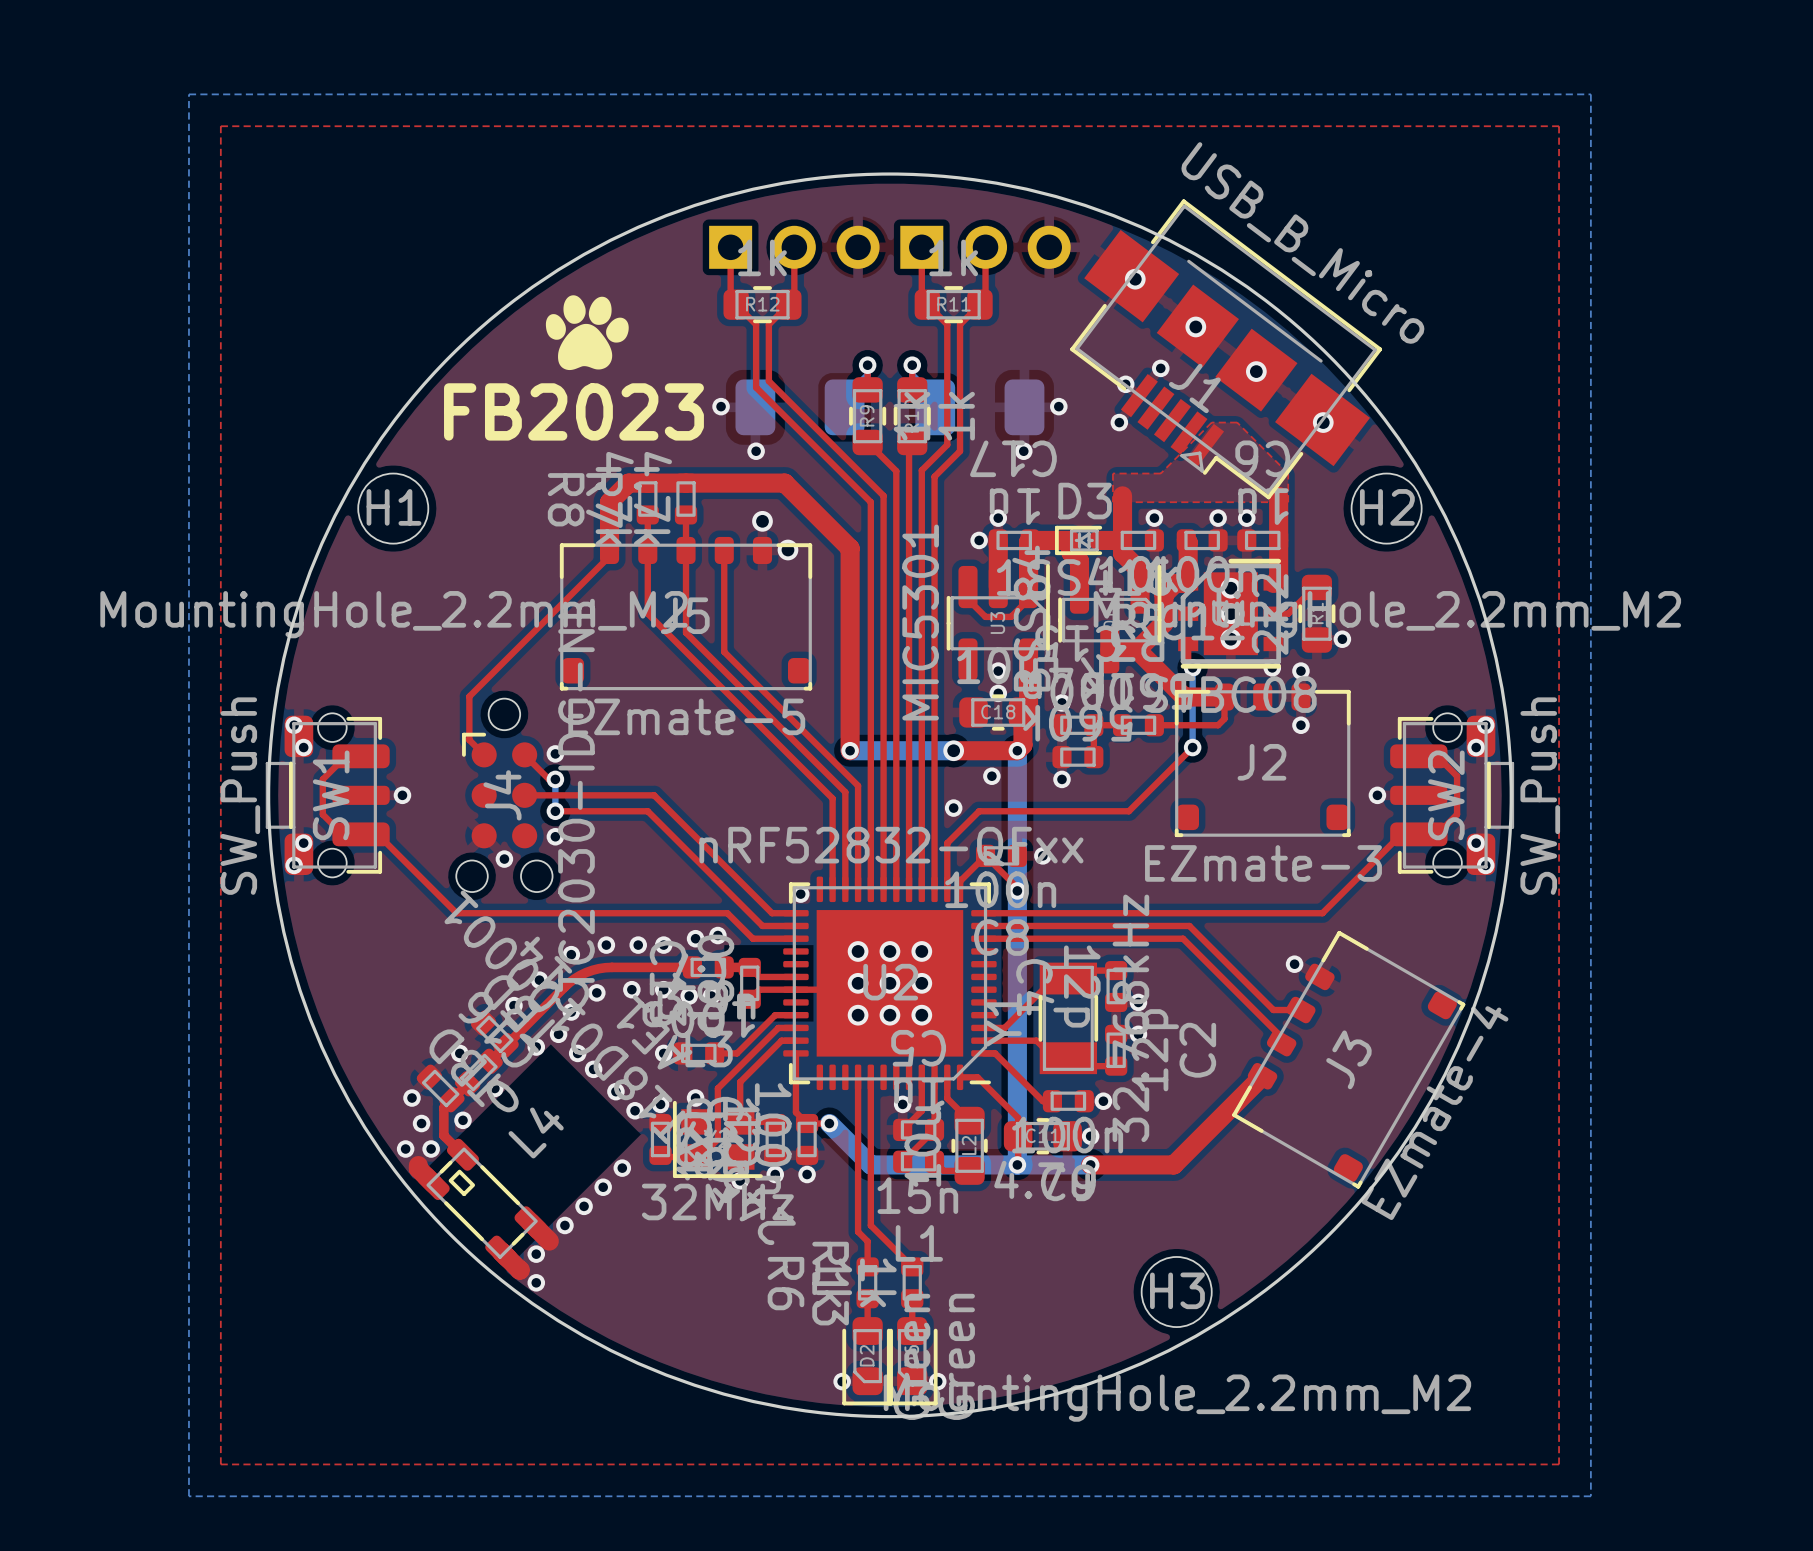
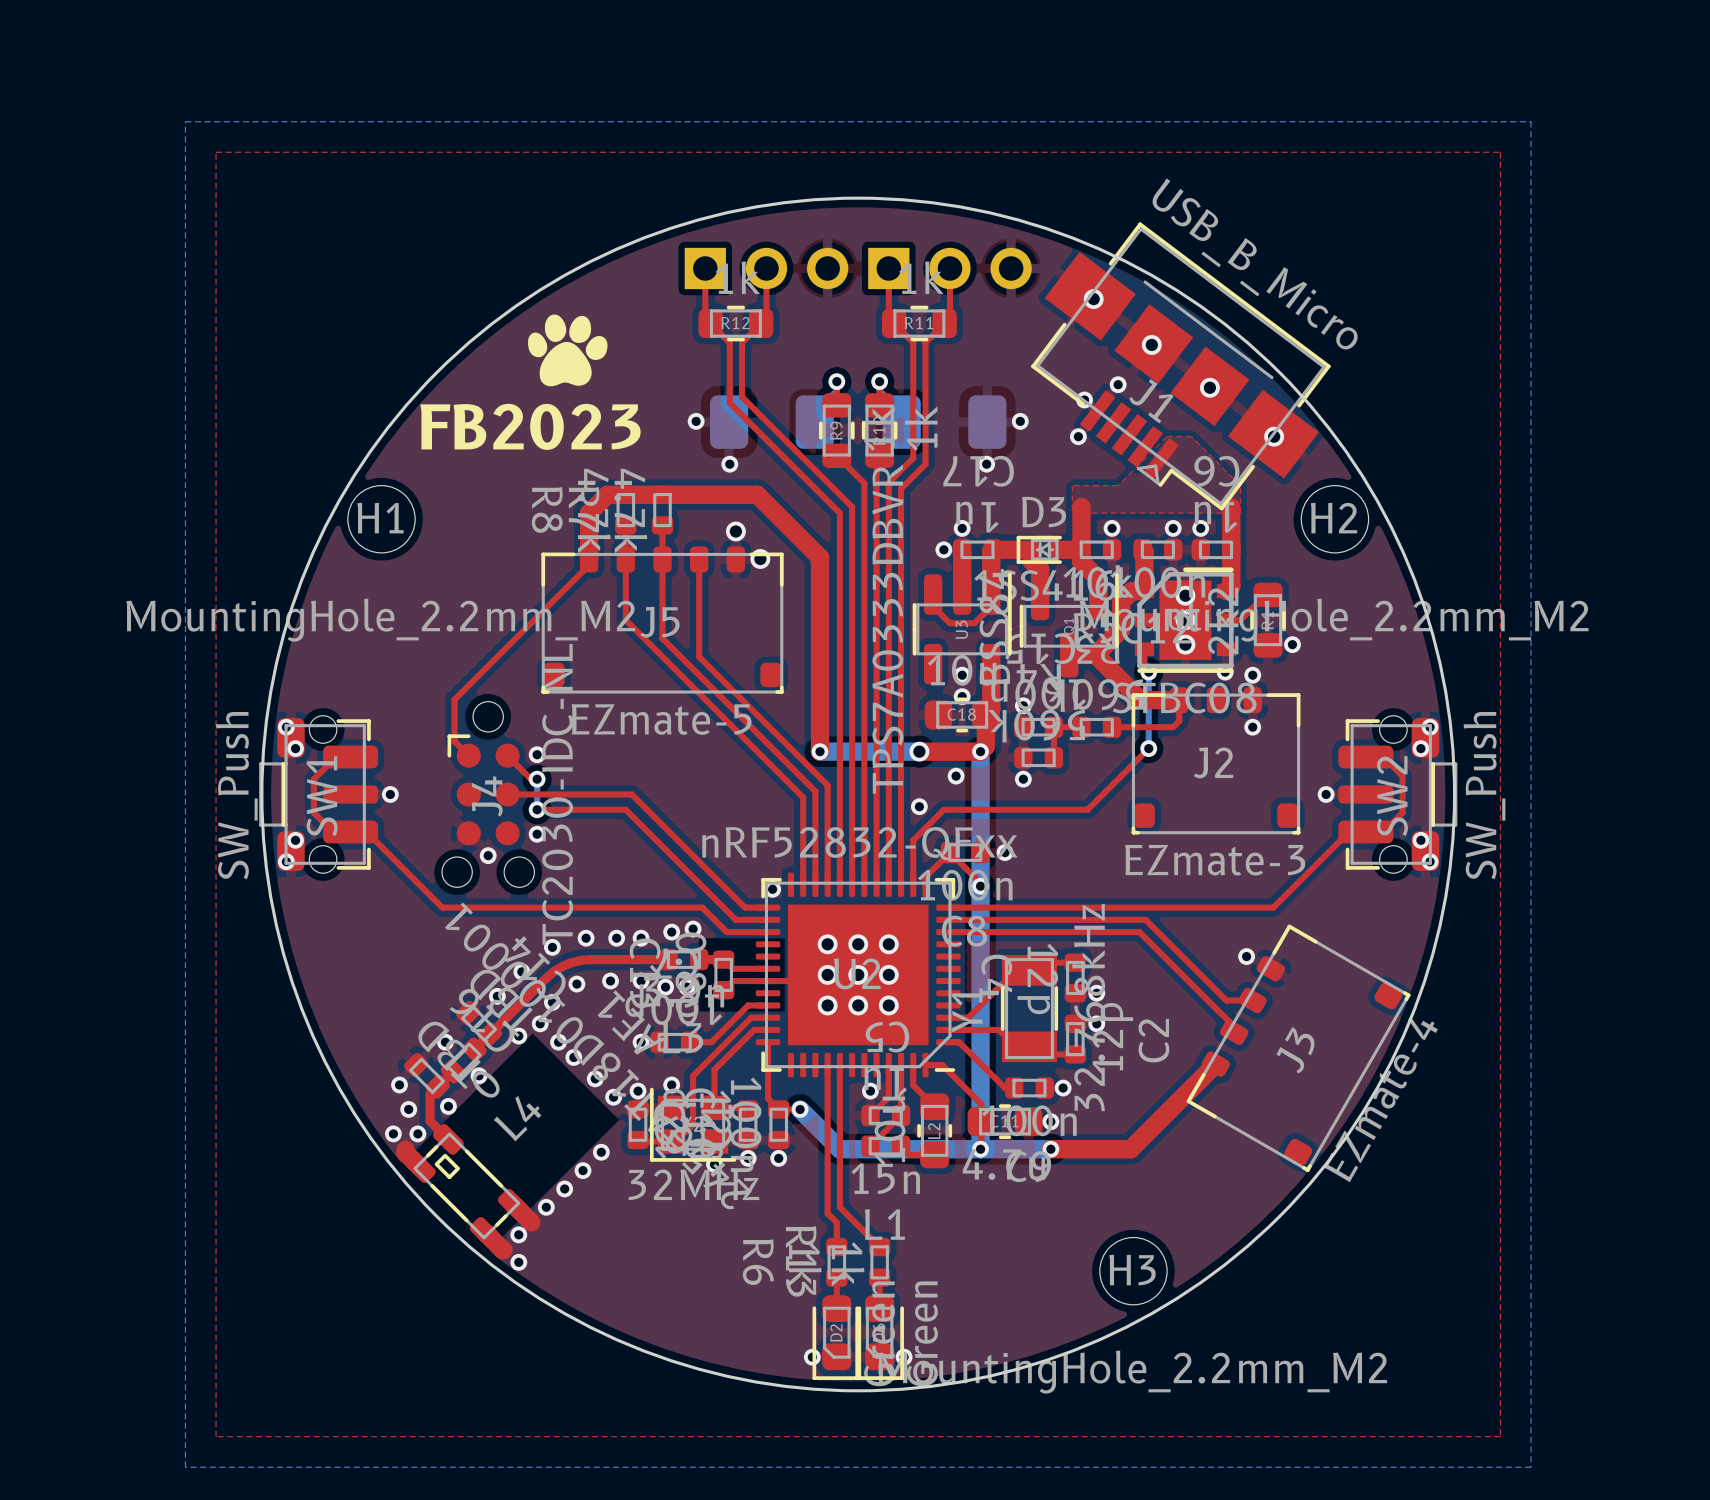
U3 value: MIC5301 (920, 622) -> TPS7A0333DBVR (887, 629)

